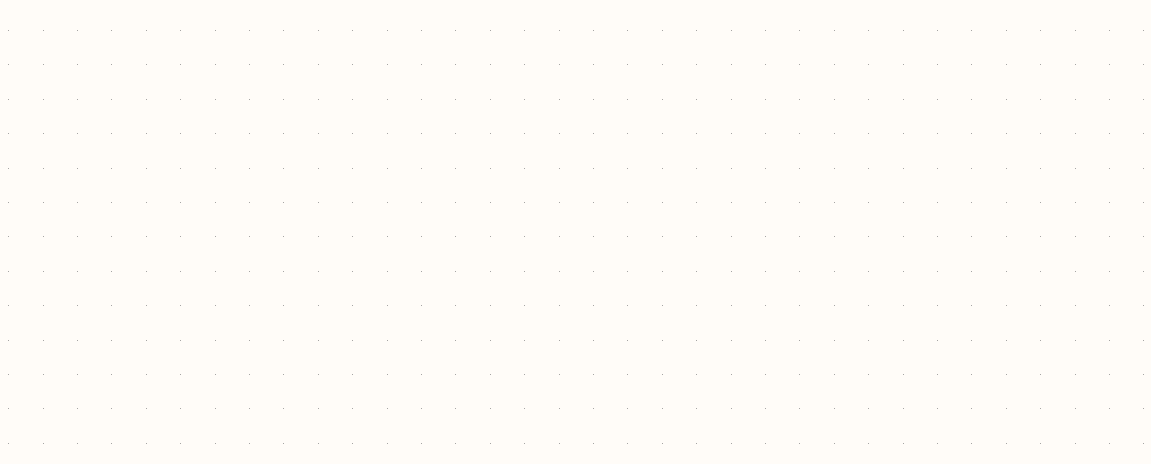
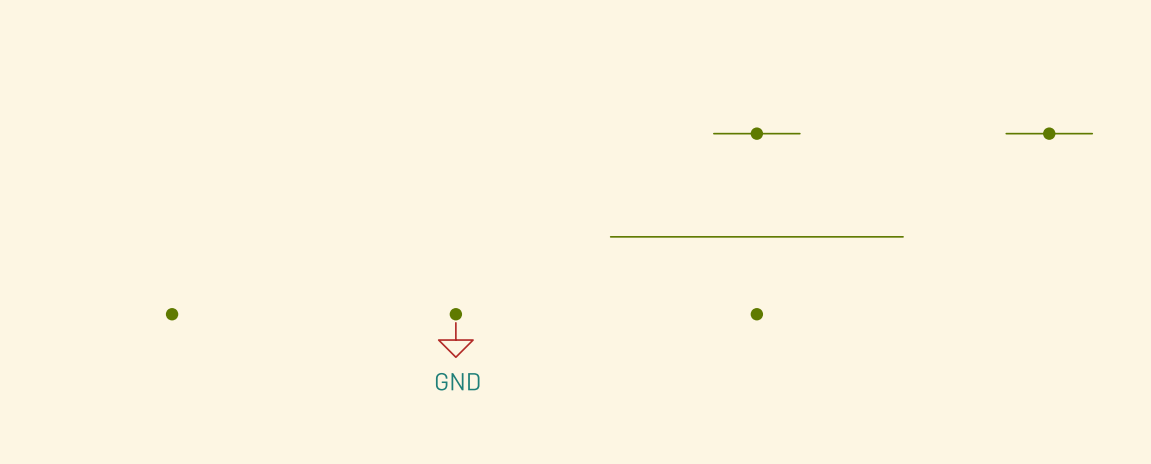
wire: none -> (713, 133) (799, 133)
junction: none -> (756, 133)
wire: none -> (1006, 133) (1092, 133)
junction: none -> (1049, 133)
wire: none -> (610, 236) (903, 236)
junction: none -> (172, 314)
junction: none -> (455, 314)
junction: none -> (756, 314)
power symbol: none -> GND (455, 340)

